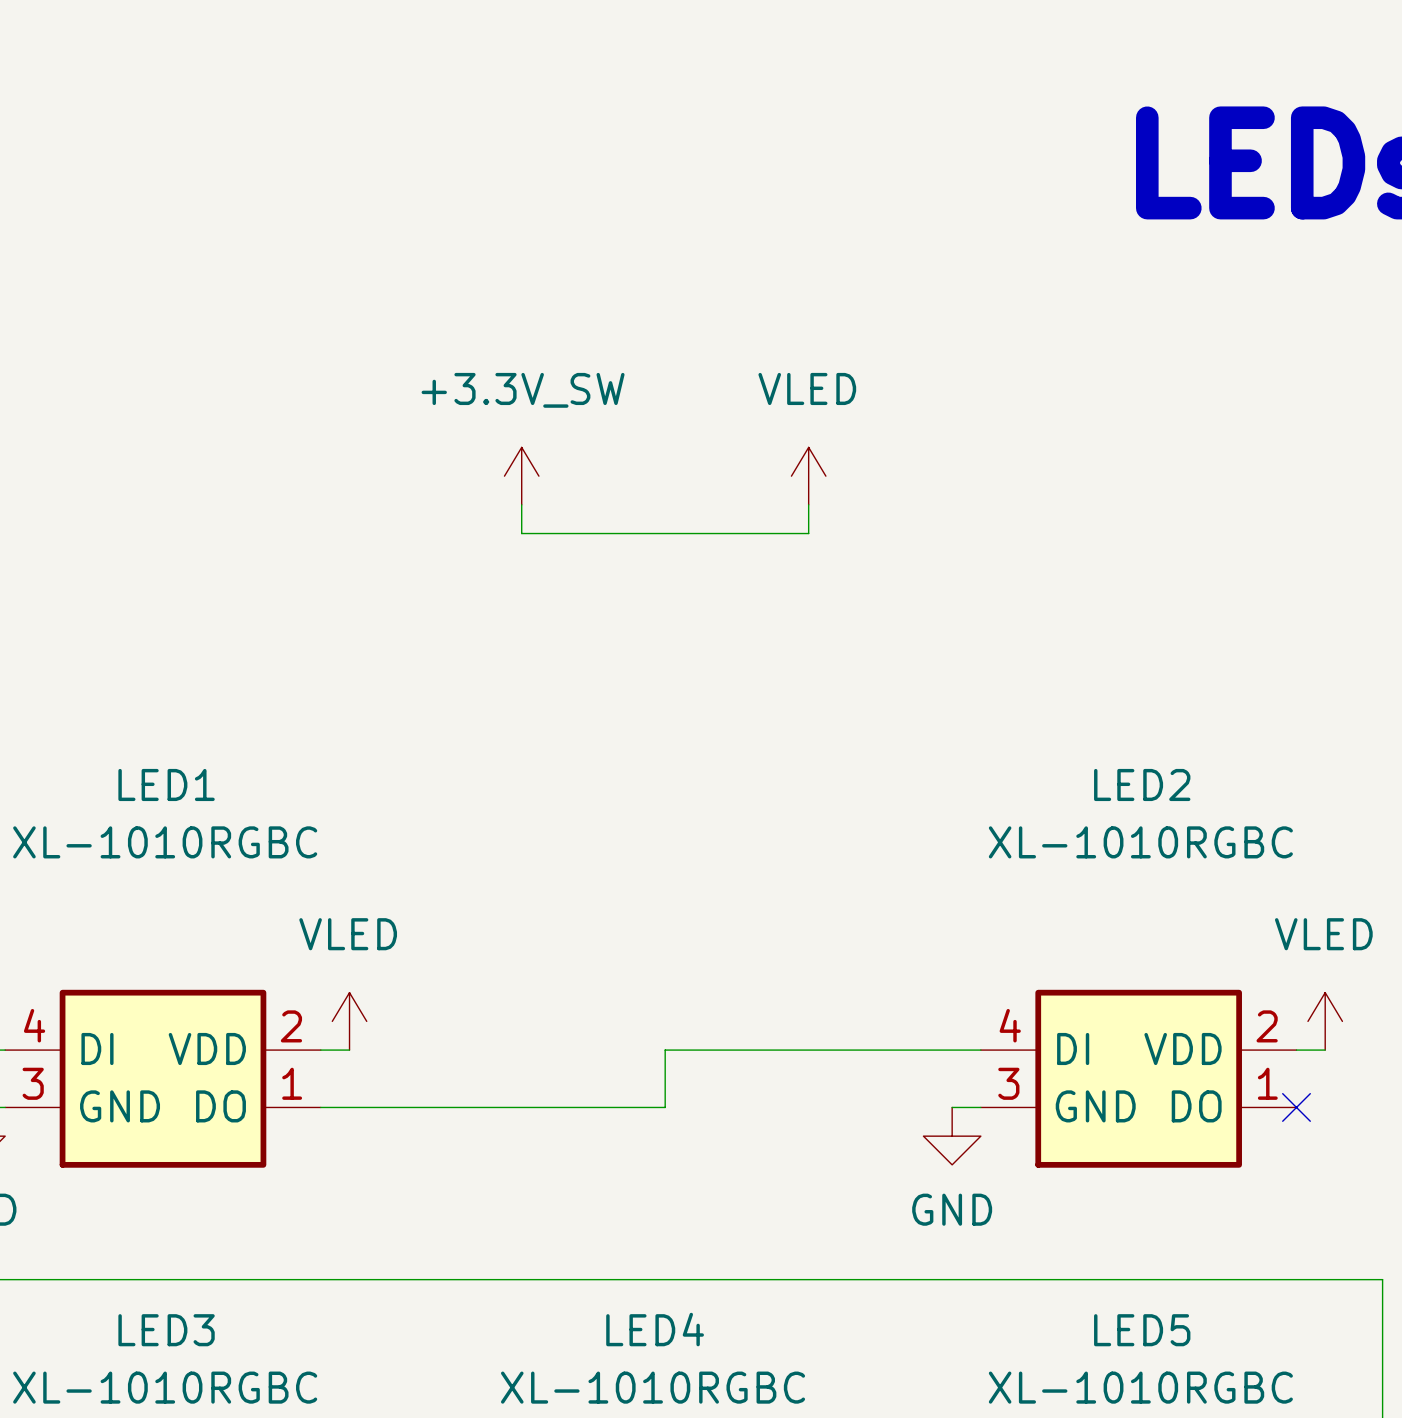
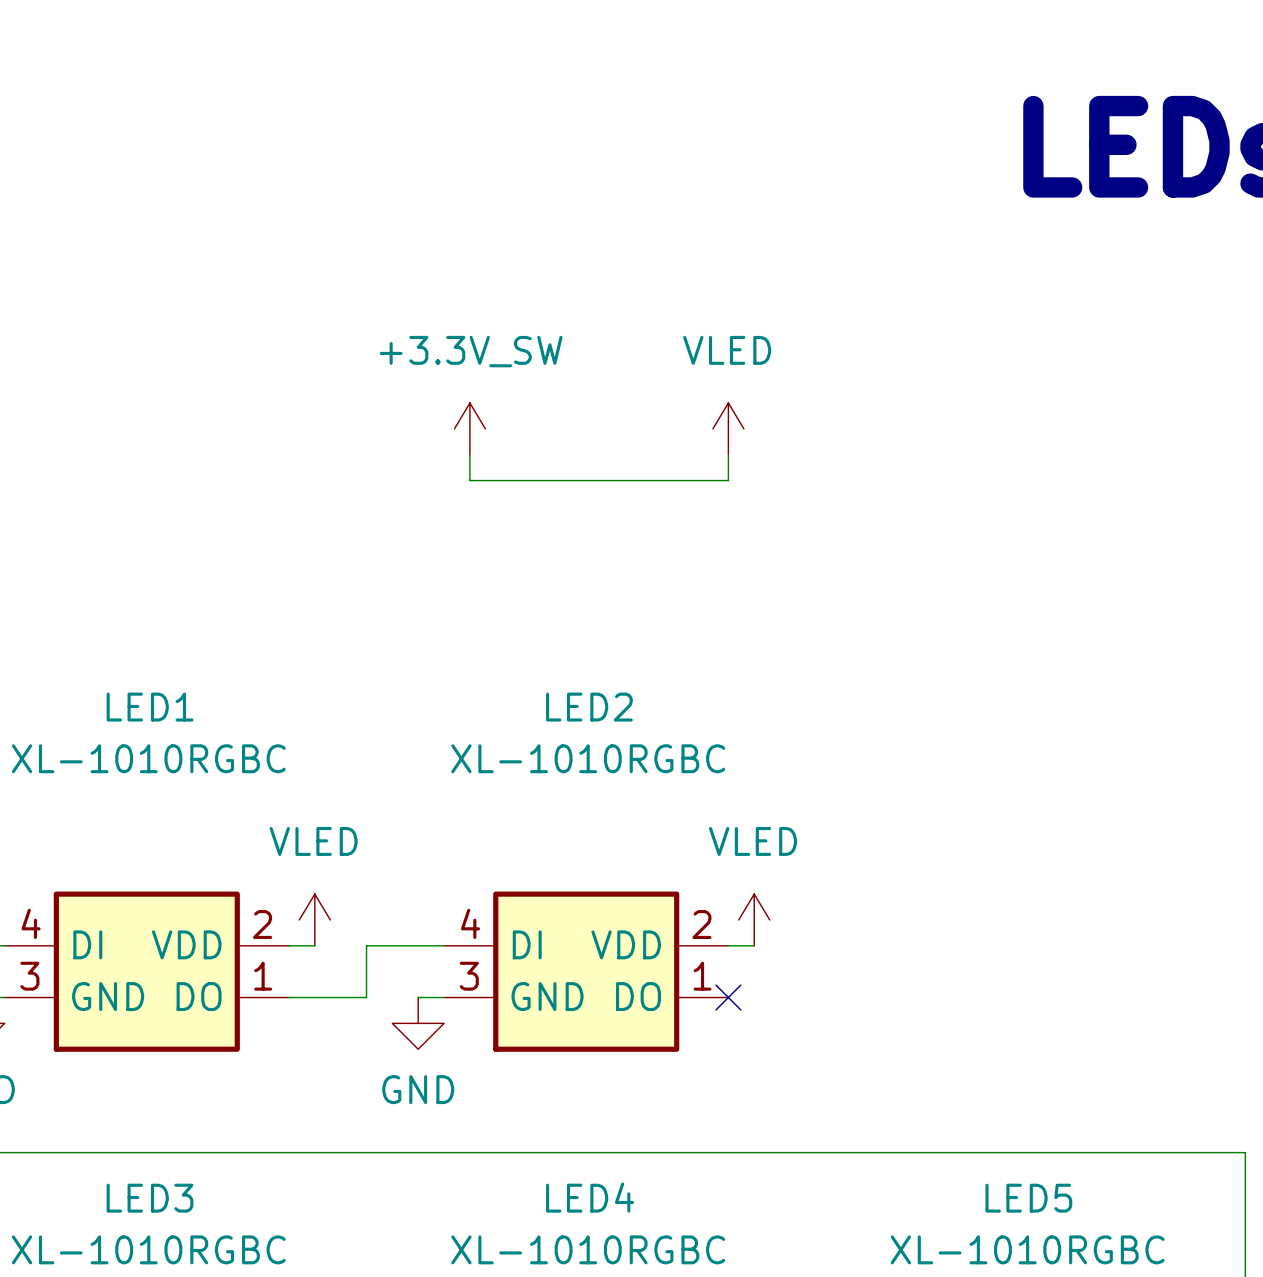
power symbol position: VLED (1325, 1021) -> VLED (754, 919)
wire: (837, 1050) (980, 1050) -> none
wire: (1296, 1050) (1325, 1050) -> none
LED2 position: (1138, 1078) -> (586, 971)
wire: (406, 1107) (464, 1107) -> (366, 997) (366, 945) (444, 945)
no-connect mark: none -> (728, 997)
wire: (952, 1107) (980, 1107) -> none
no-connect mark: (1296, 1107) -> none
power symbol position: GND (952, 1136) -> GND (418, 1023)

